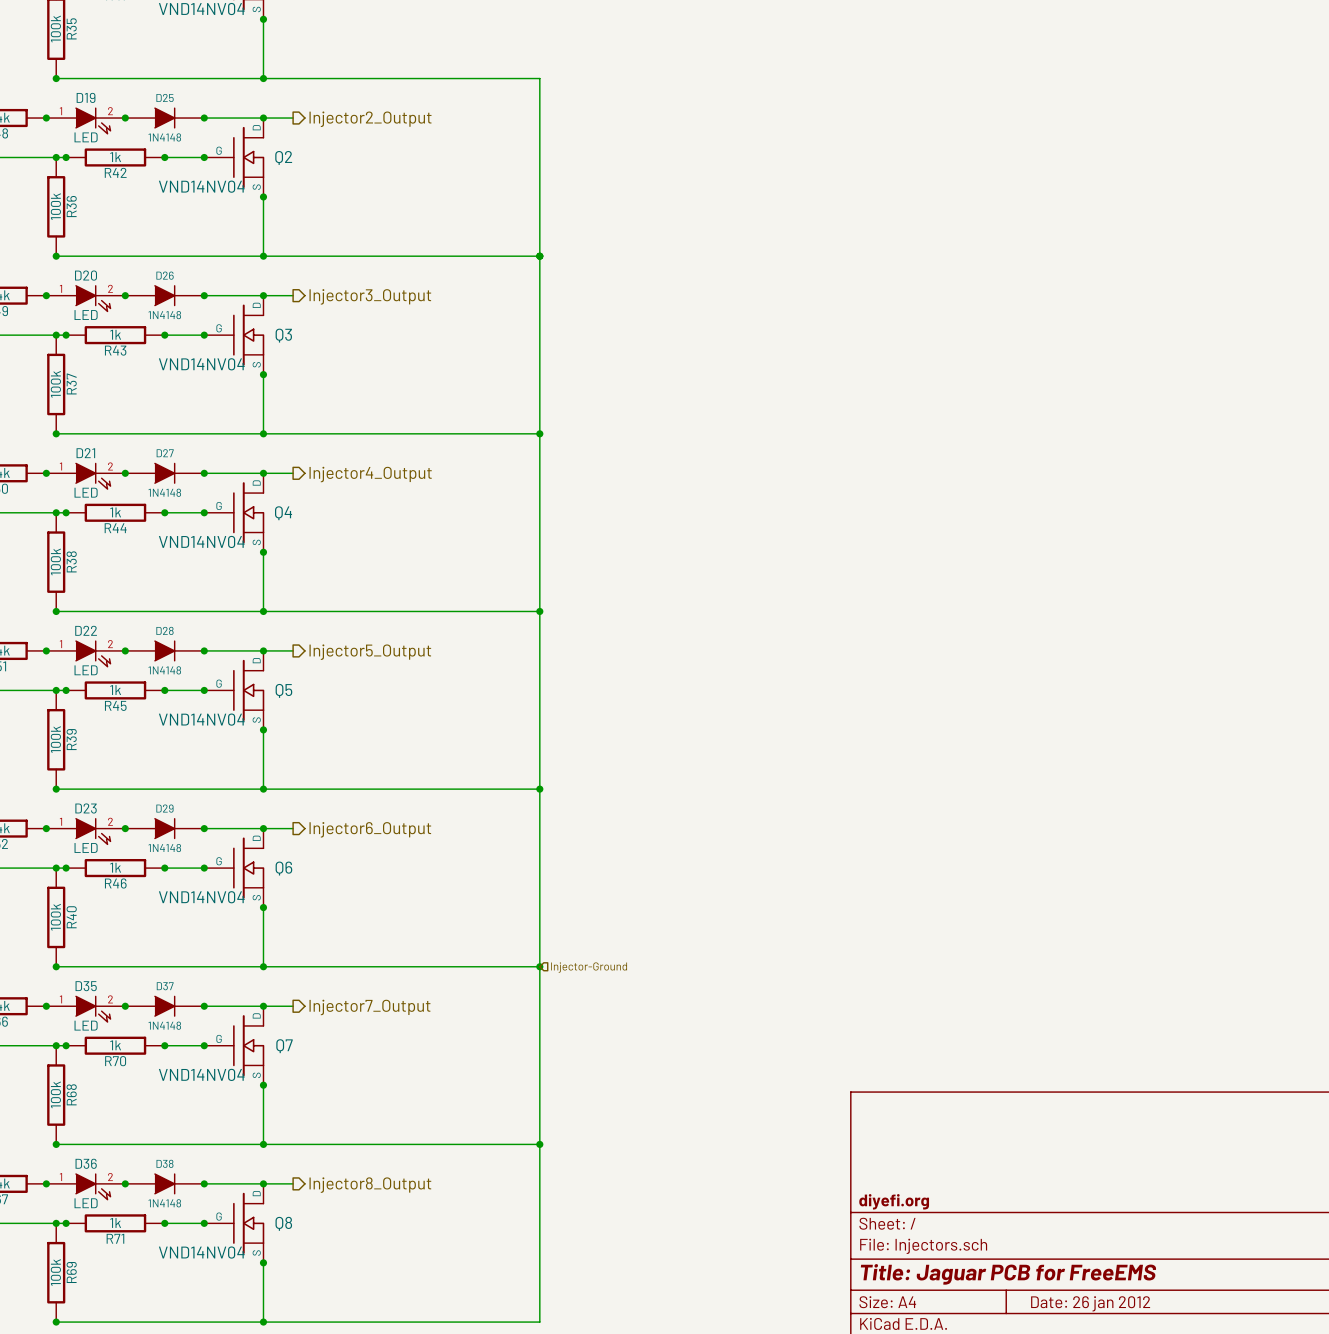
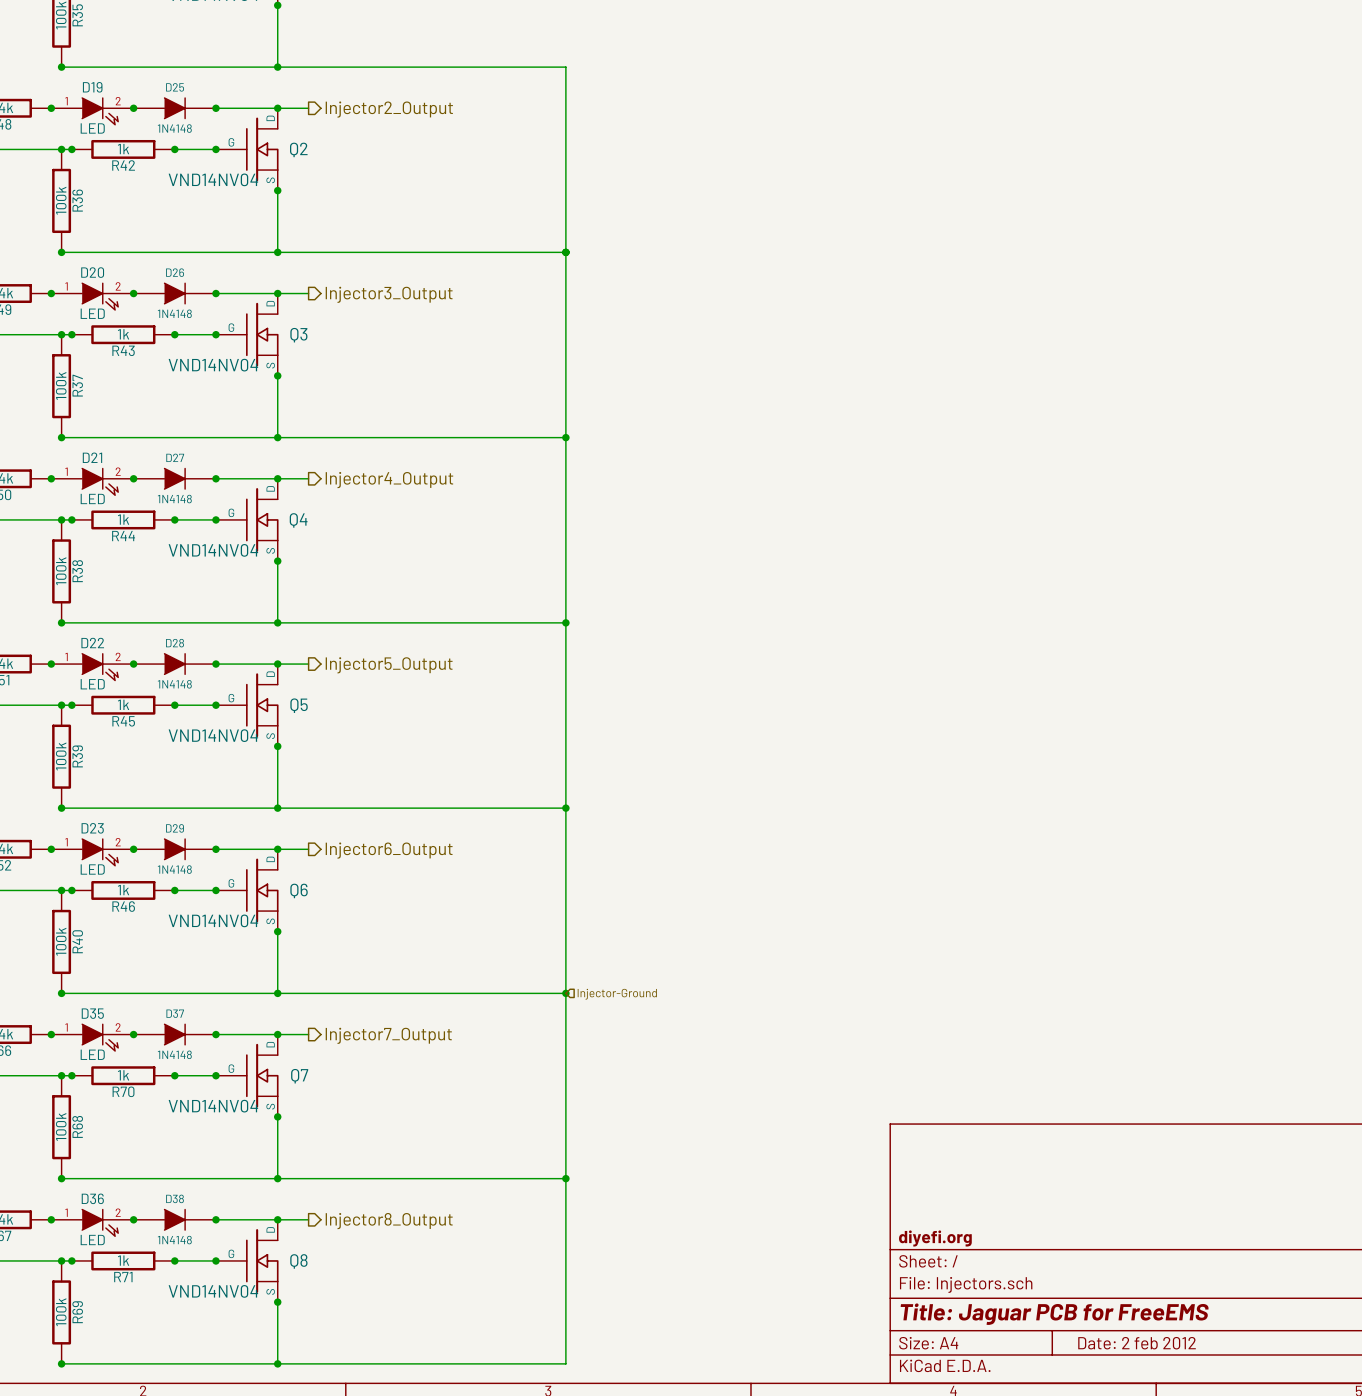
title block: Date: 26 jan 2012 (1090, 1303) -> Date: 2 feb 2012 (1137, 1343)

